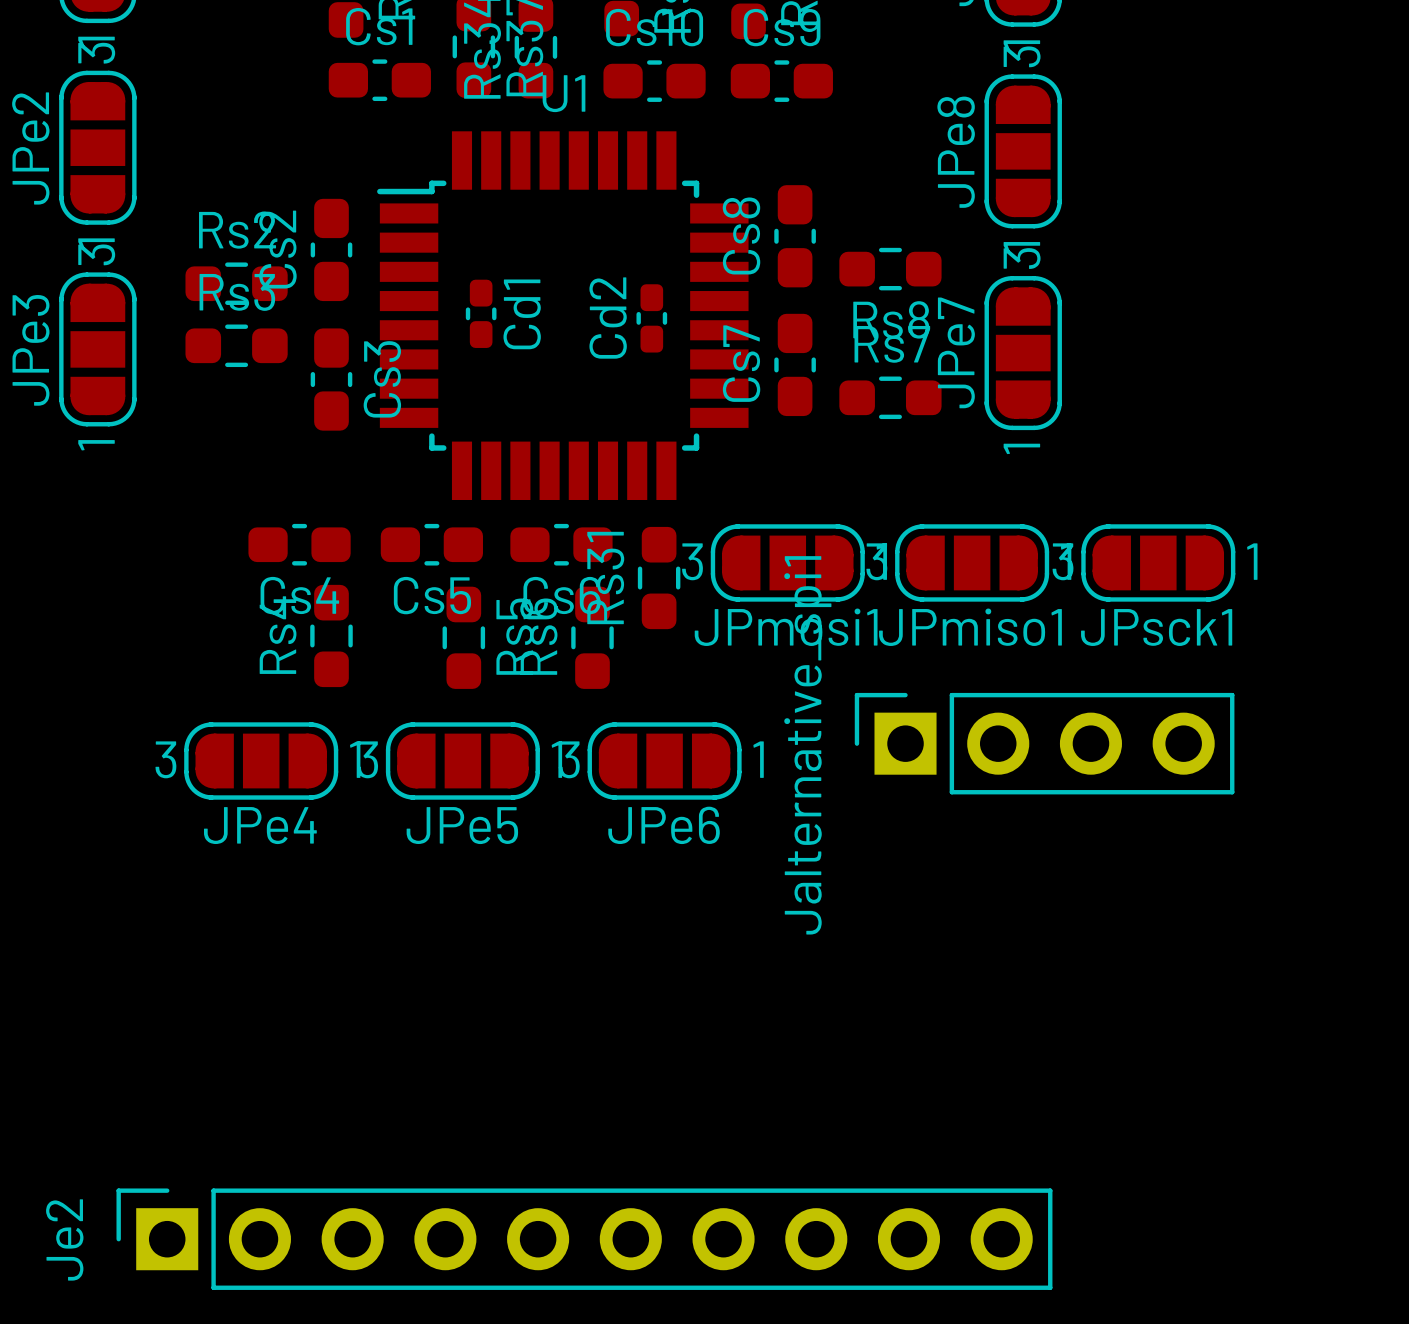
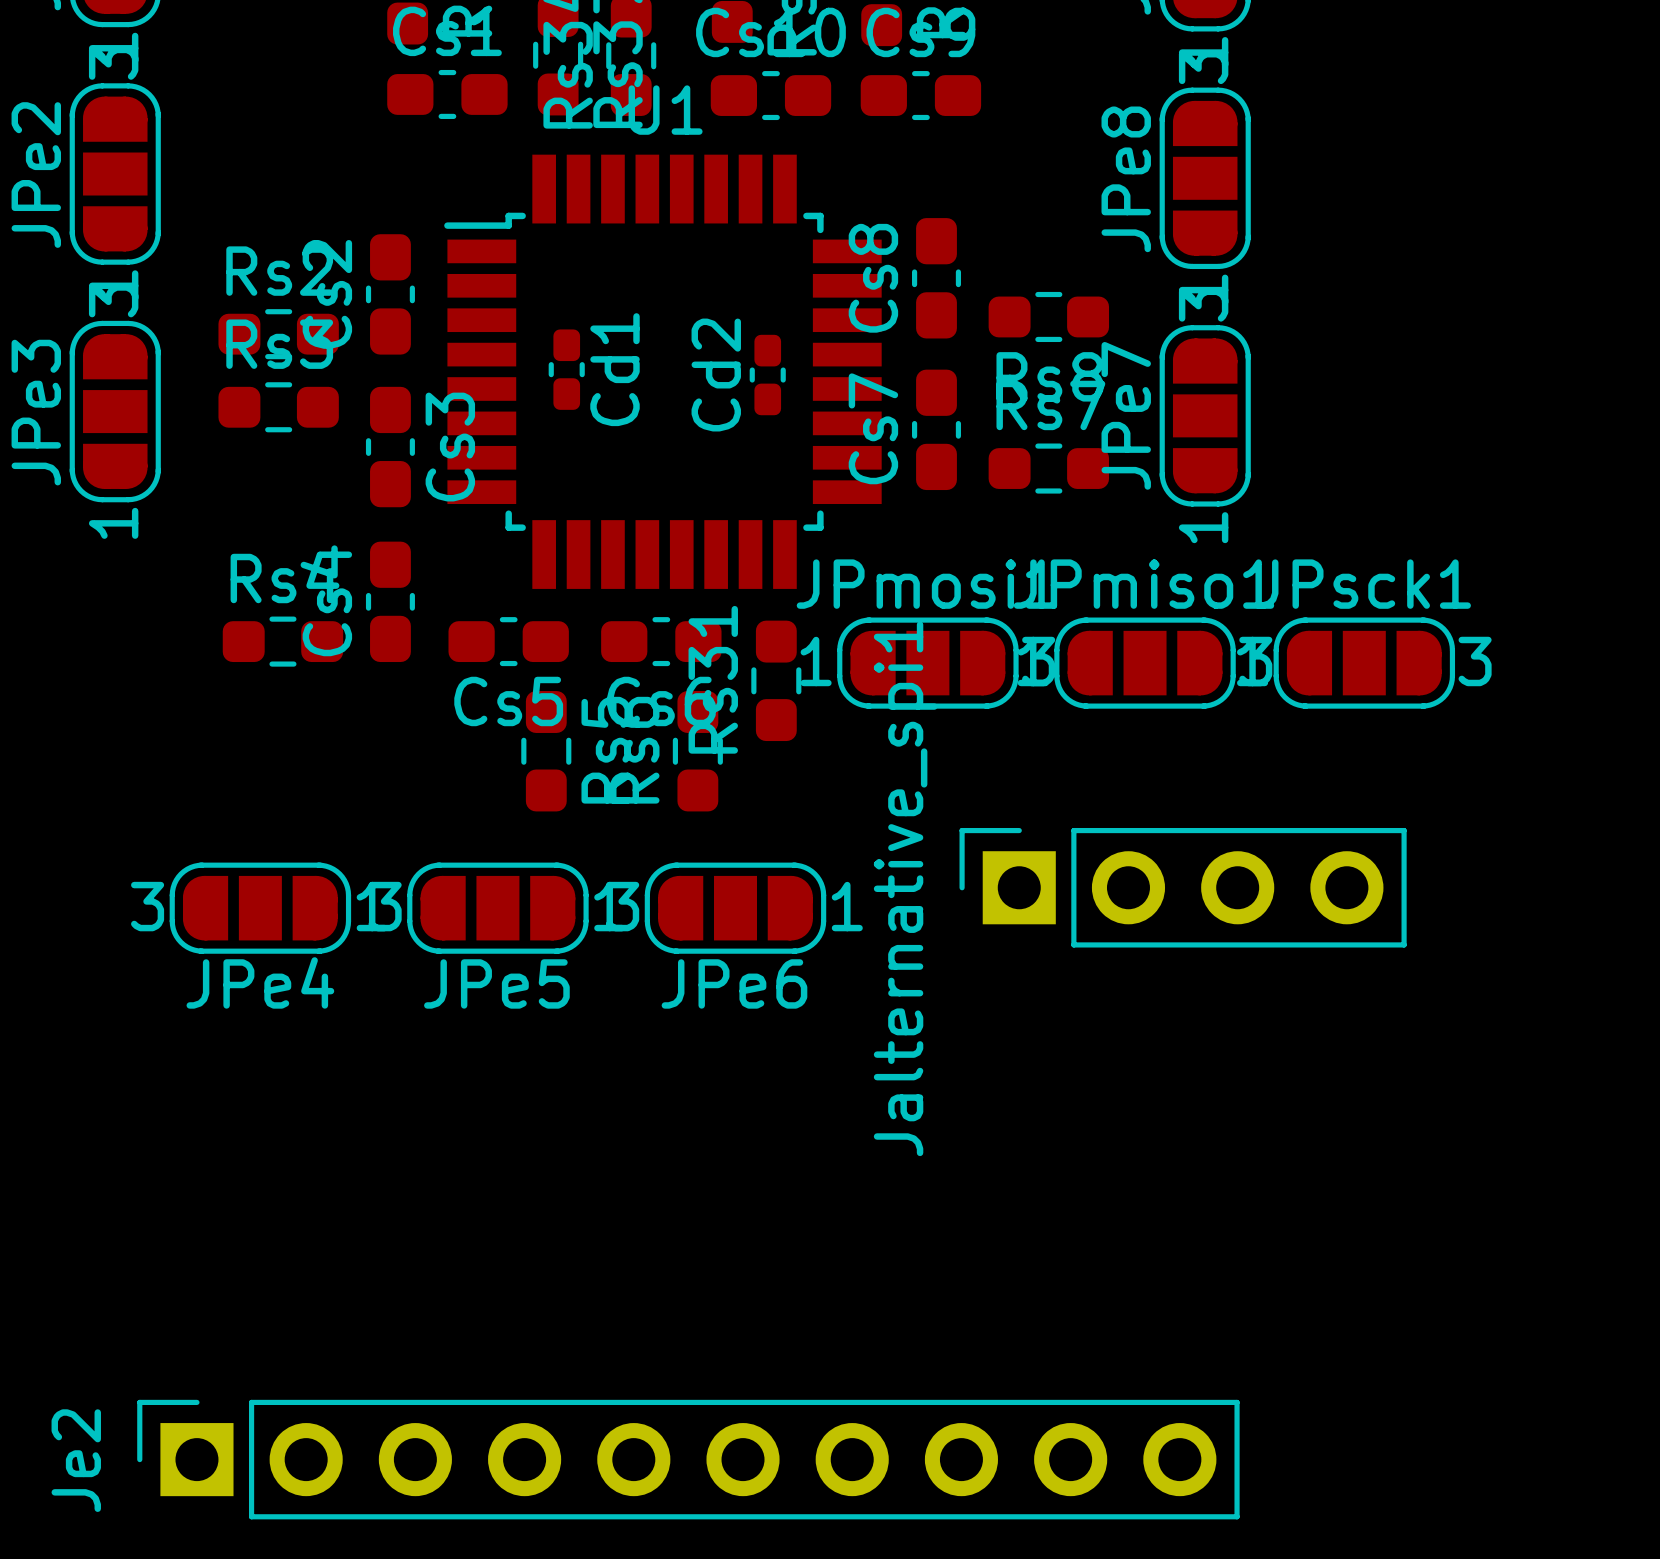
Cs4 rotation: 0° (299, 544) -> 90° clockwise (390, 601)
JPmosi1 rotation: 0° (787, 562) -> 180° (927, 663)
JPmiso1 rotation: 0° (972, 562) -> 180° (1145, 663)
JPsck1 rotation: 0° (1158, 562) -> 180° (1364, 663)
Rs4 rotation: 0° (331, 635) -> 90° clockwise (282, 641)
Rs4 position: (331, 635) -> (282, 641)
Jalternative_spi1 position: (1044, 743) -> (1183, 887)
JPe4 position: (261, 761) -> (260, 908)
JPe5 position: (462, 761) -> (497, 908)
JPe6 position: (664, 761) -> (735, 908)

